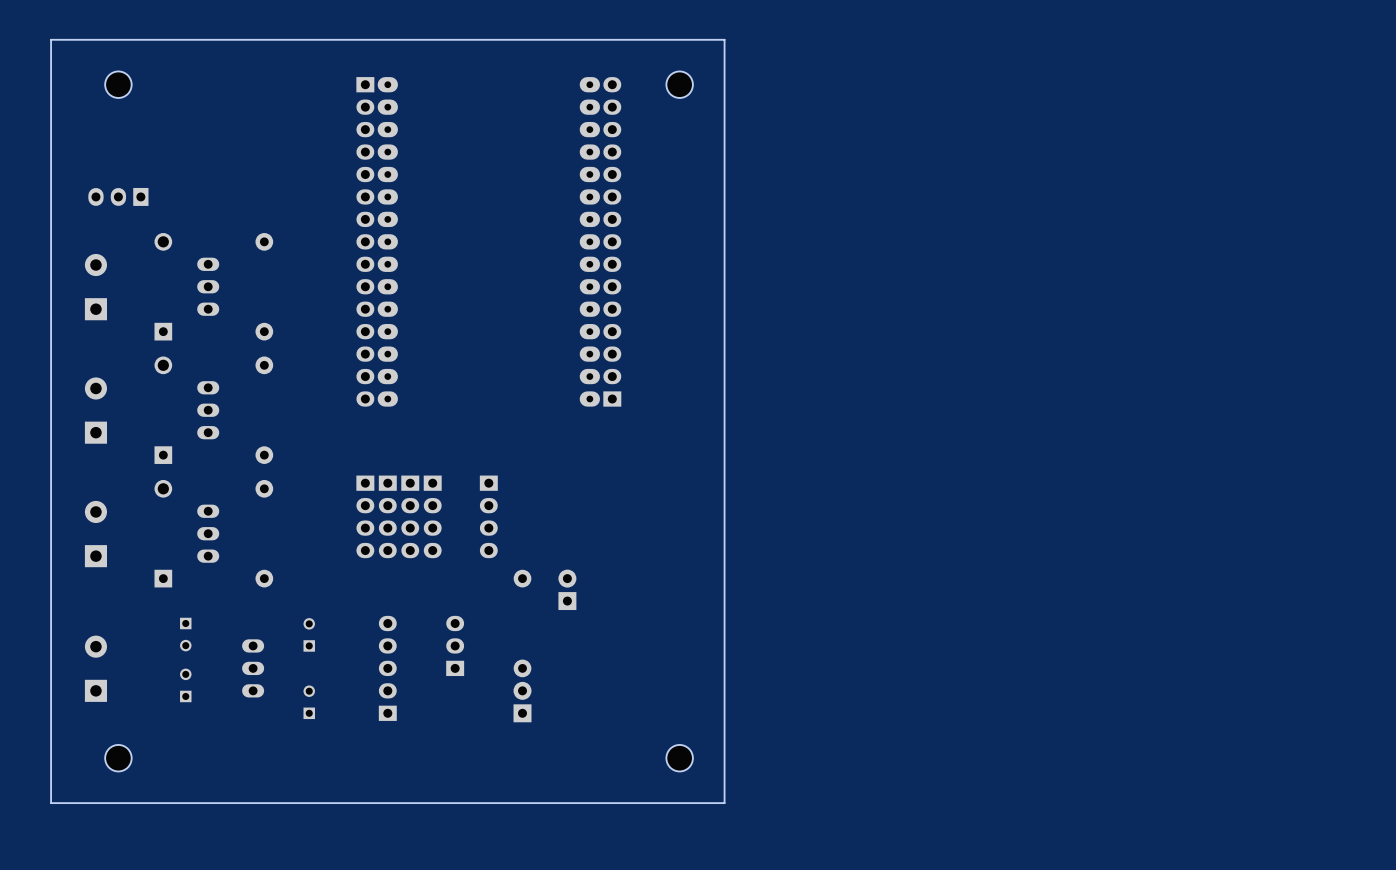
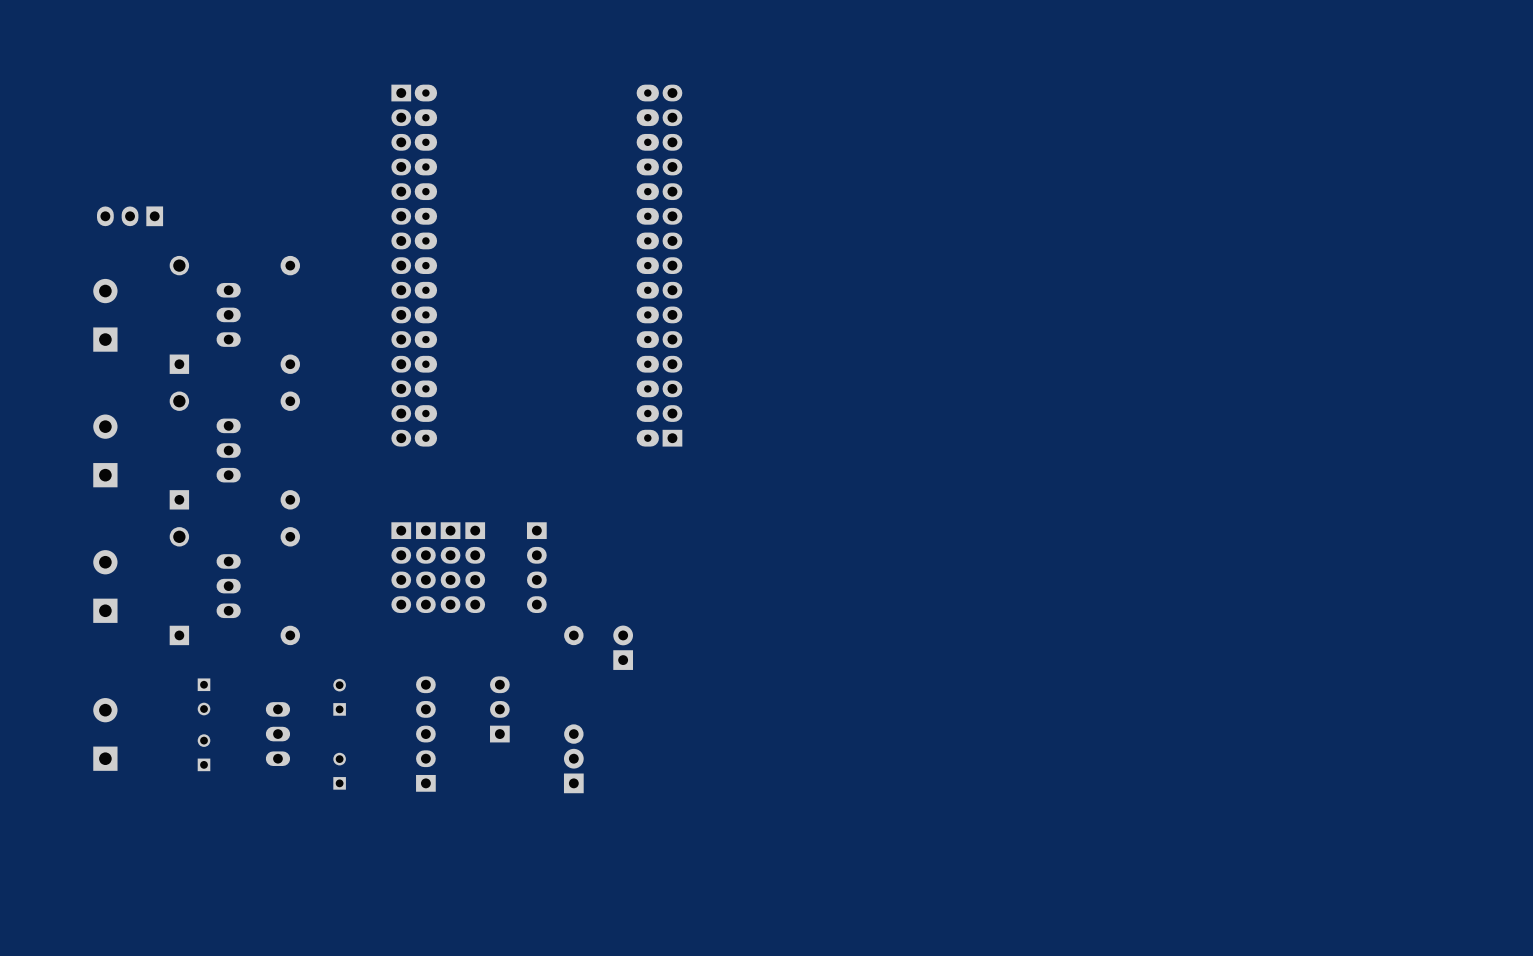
board edge: (724, 39) (724, 803) (51, 803) (51, 39) (724, 39) -> none
part: (118, 84) -> none
part: (679, 84) -> none
part: (118, 758) -> none
part: (679, 758) -> none

